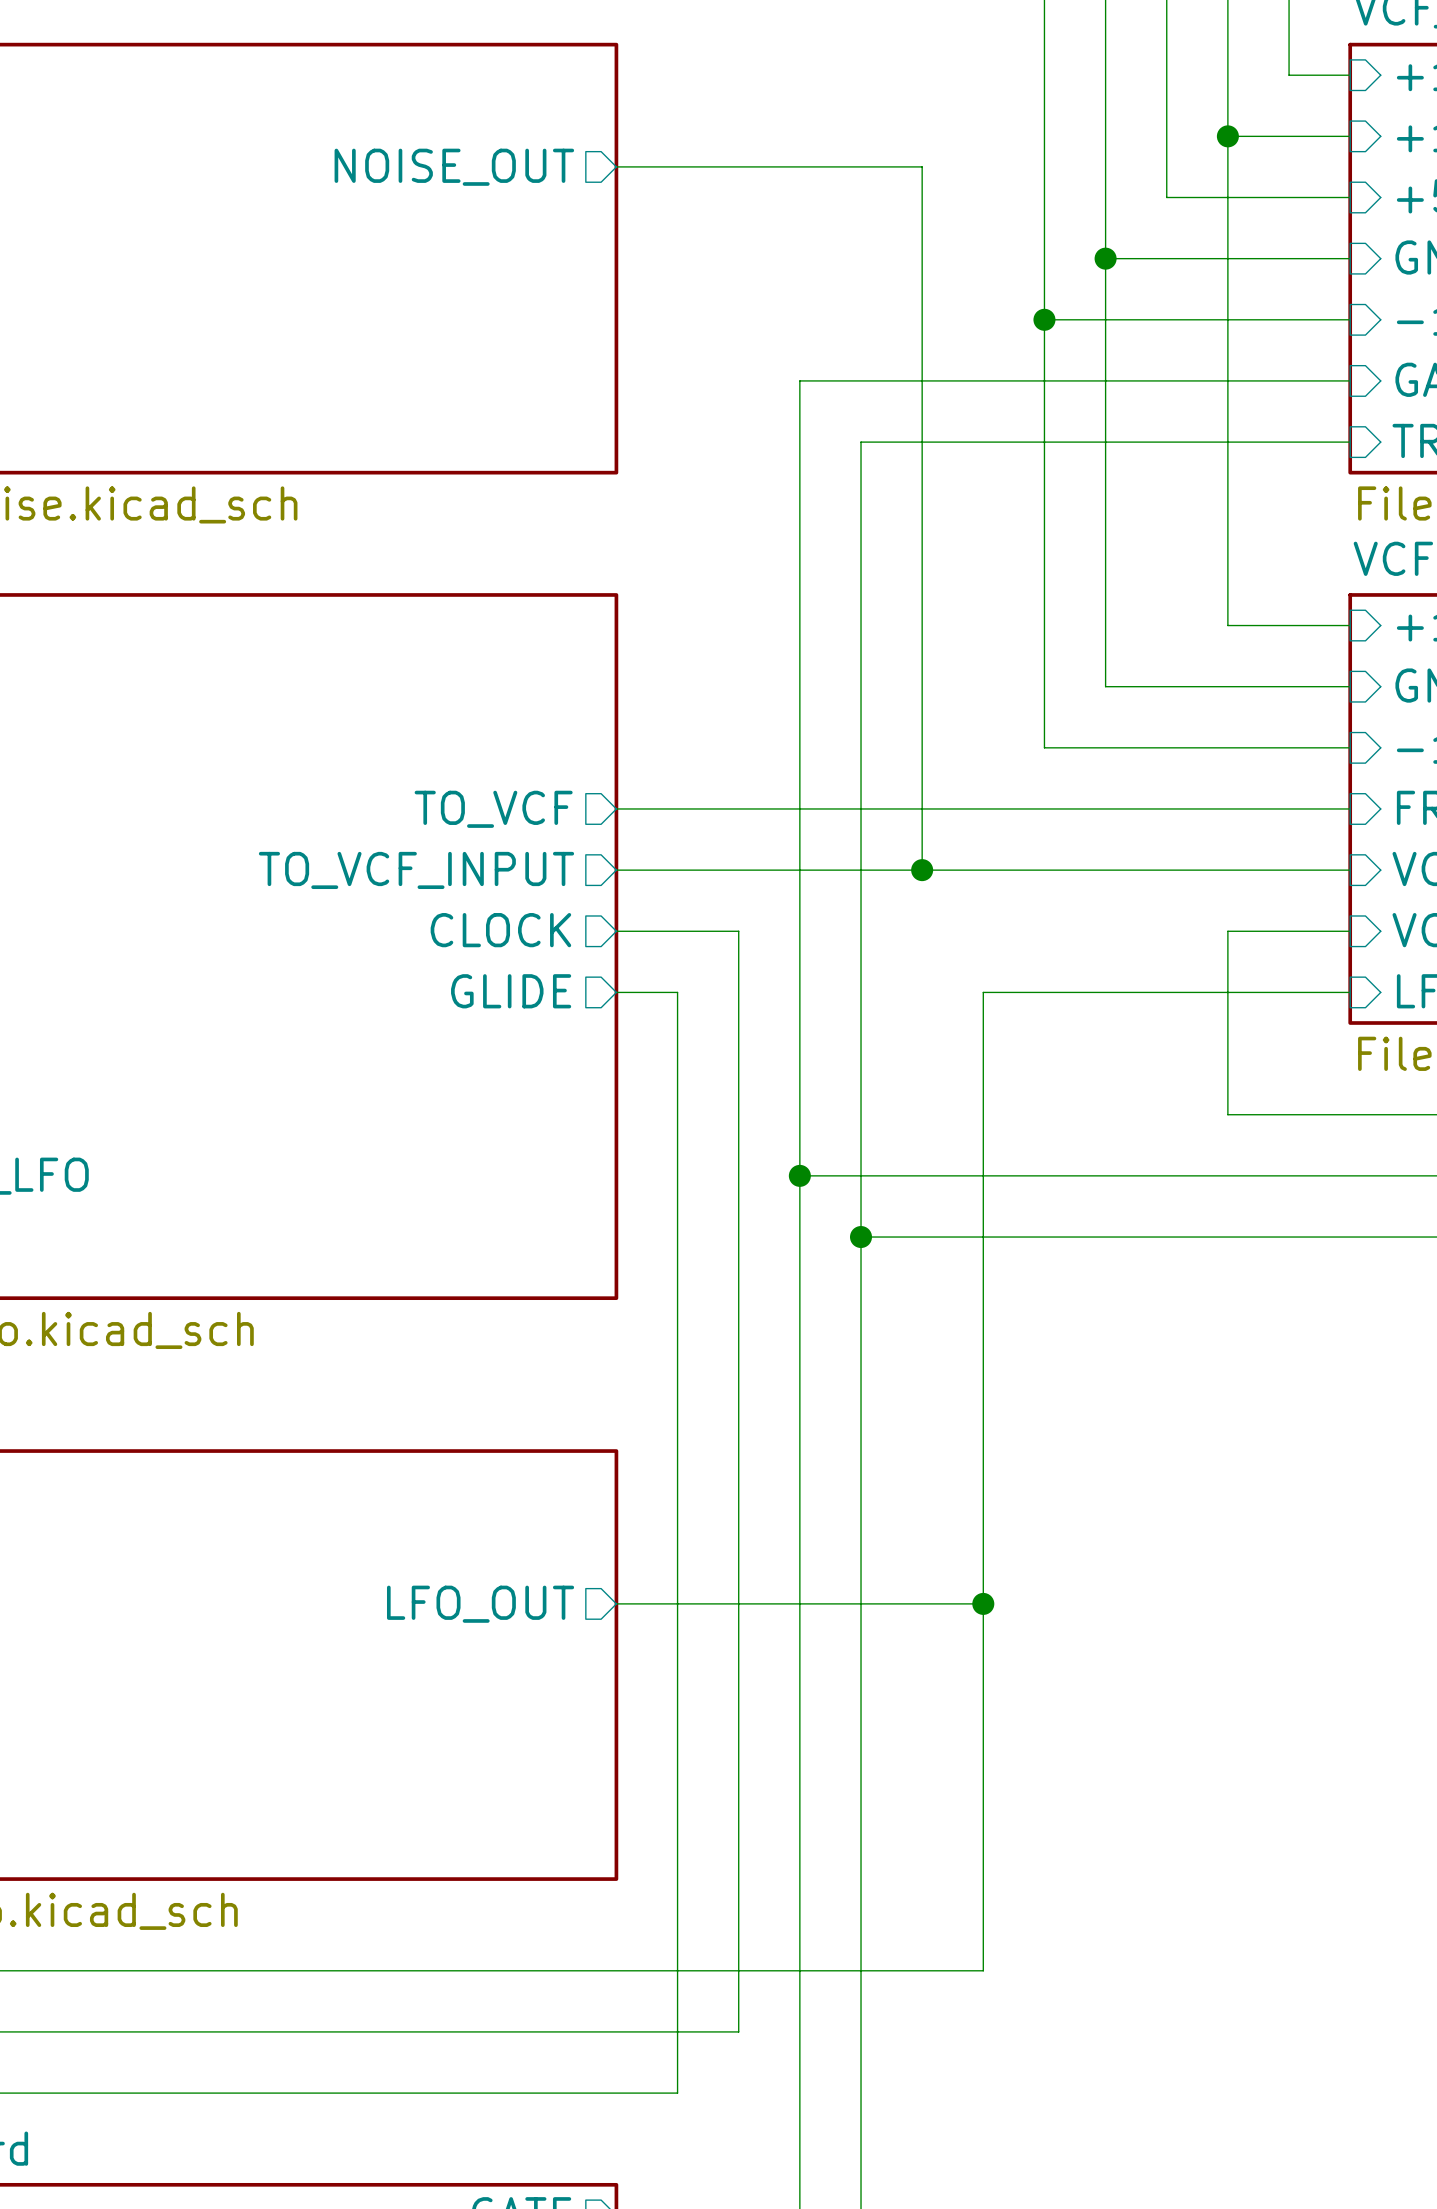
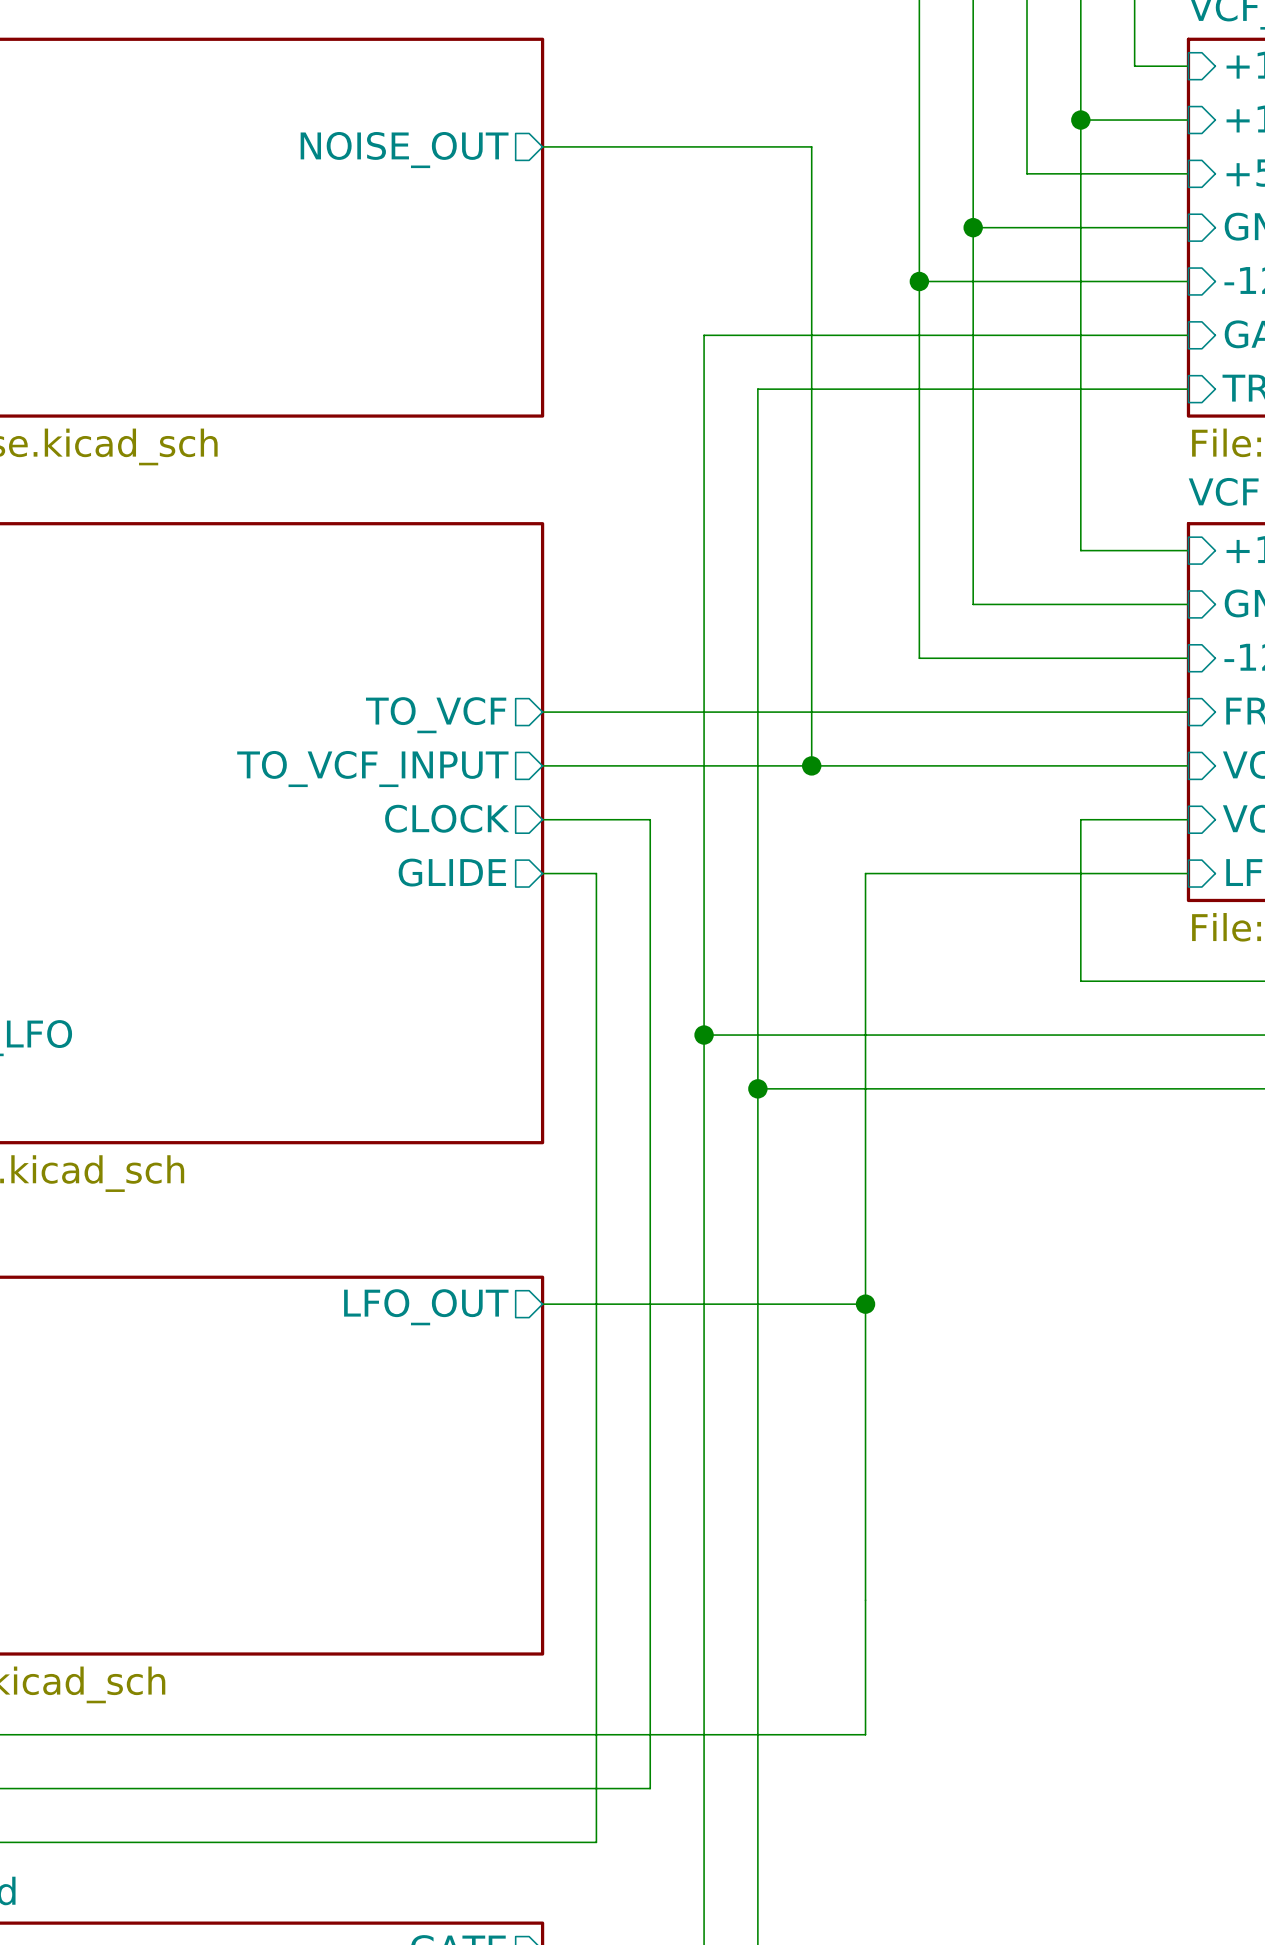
wire: (616, 1603) (983, 1603) -> (542, 1304) (865, 1304)
junction position: (983, 1603) -> (865, 1304)
sheet pin position: LFO_OUT (480, 1604) -> LFO_OUT (426, 1307)

